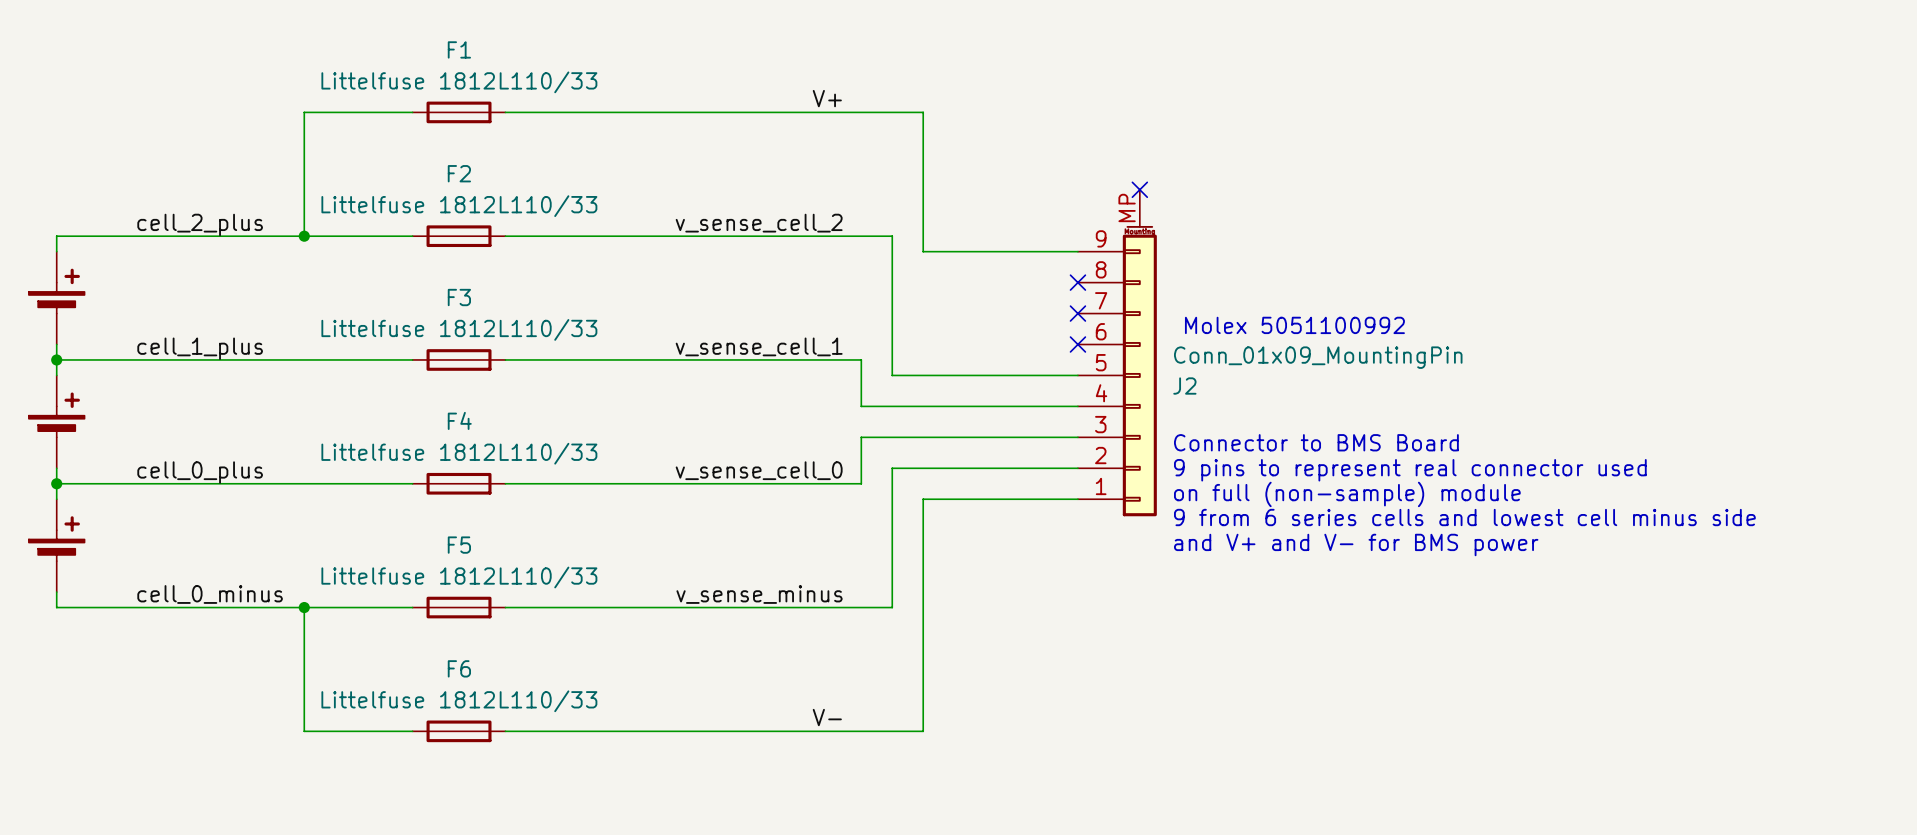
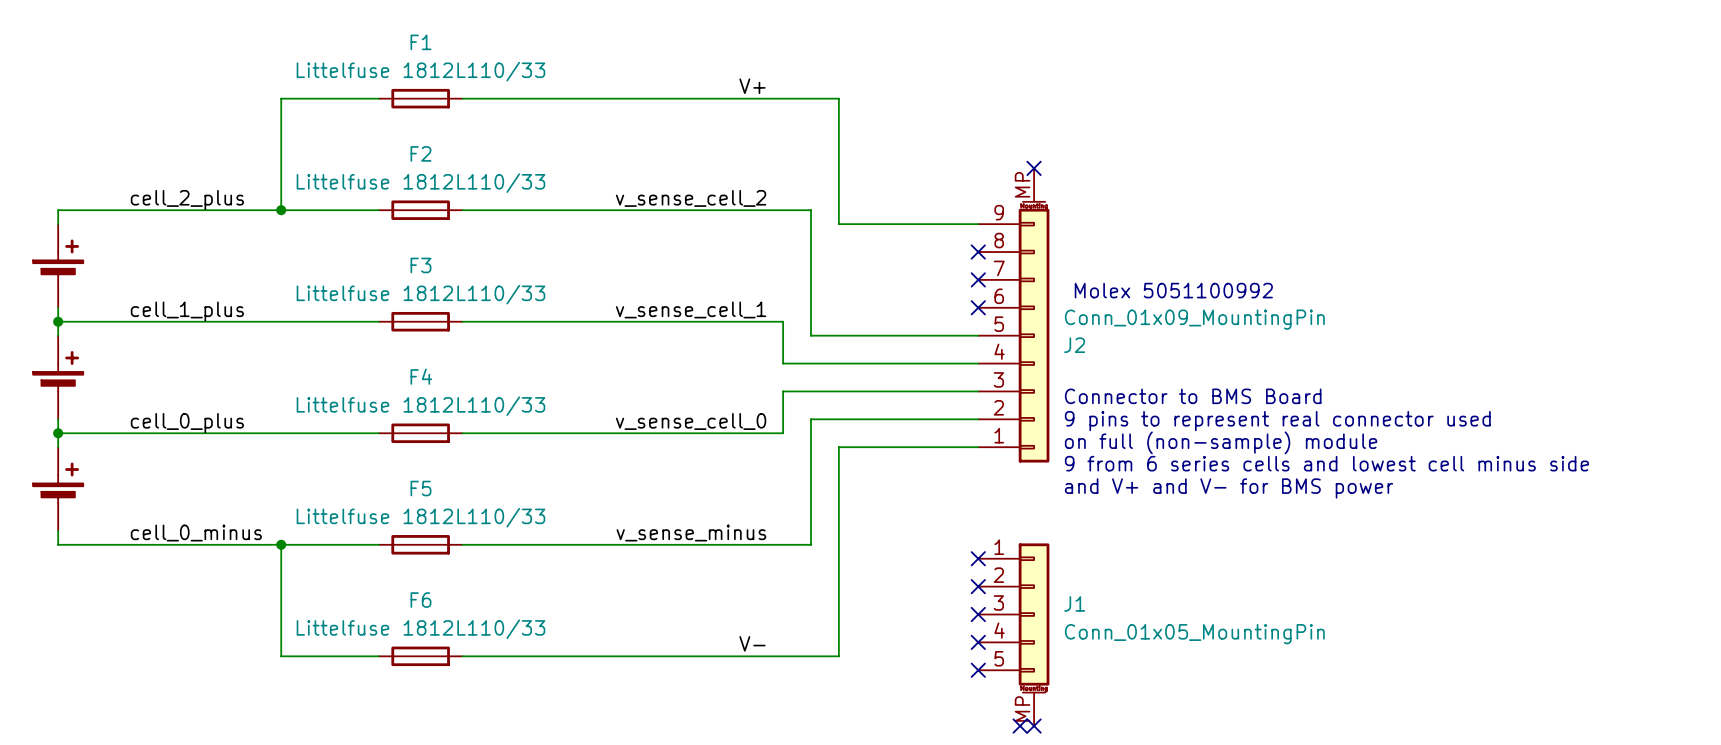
no-connect mark: none -> (978, 558)
no-connect mark: none -> (978, 586)
no-connect mark: none -> (978, 614)
J1: none -> Conn_01x05_MountingPin (1013, 634)
no-connect mark: none -> (978, 642)
no-connect mark: none -> (978, 670)
no-connect mark: none -> (1020, 726)
no-connect mark: none -> (1034, 726)

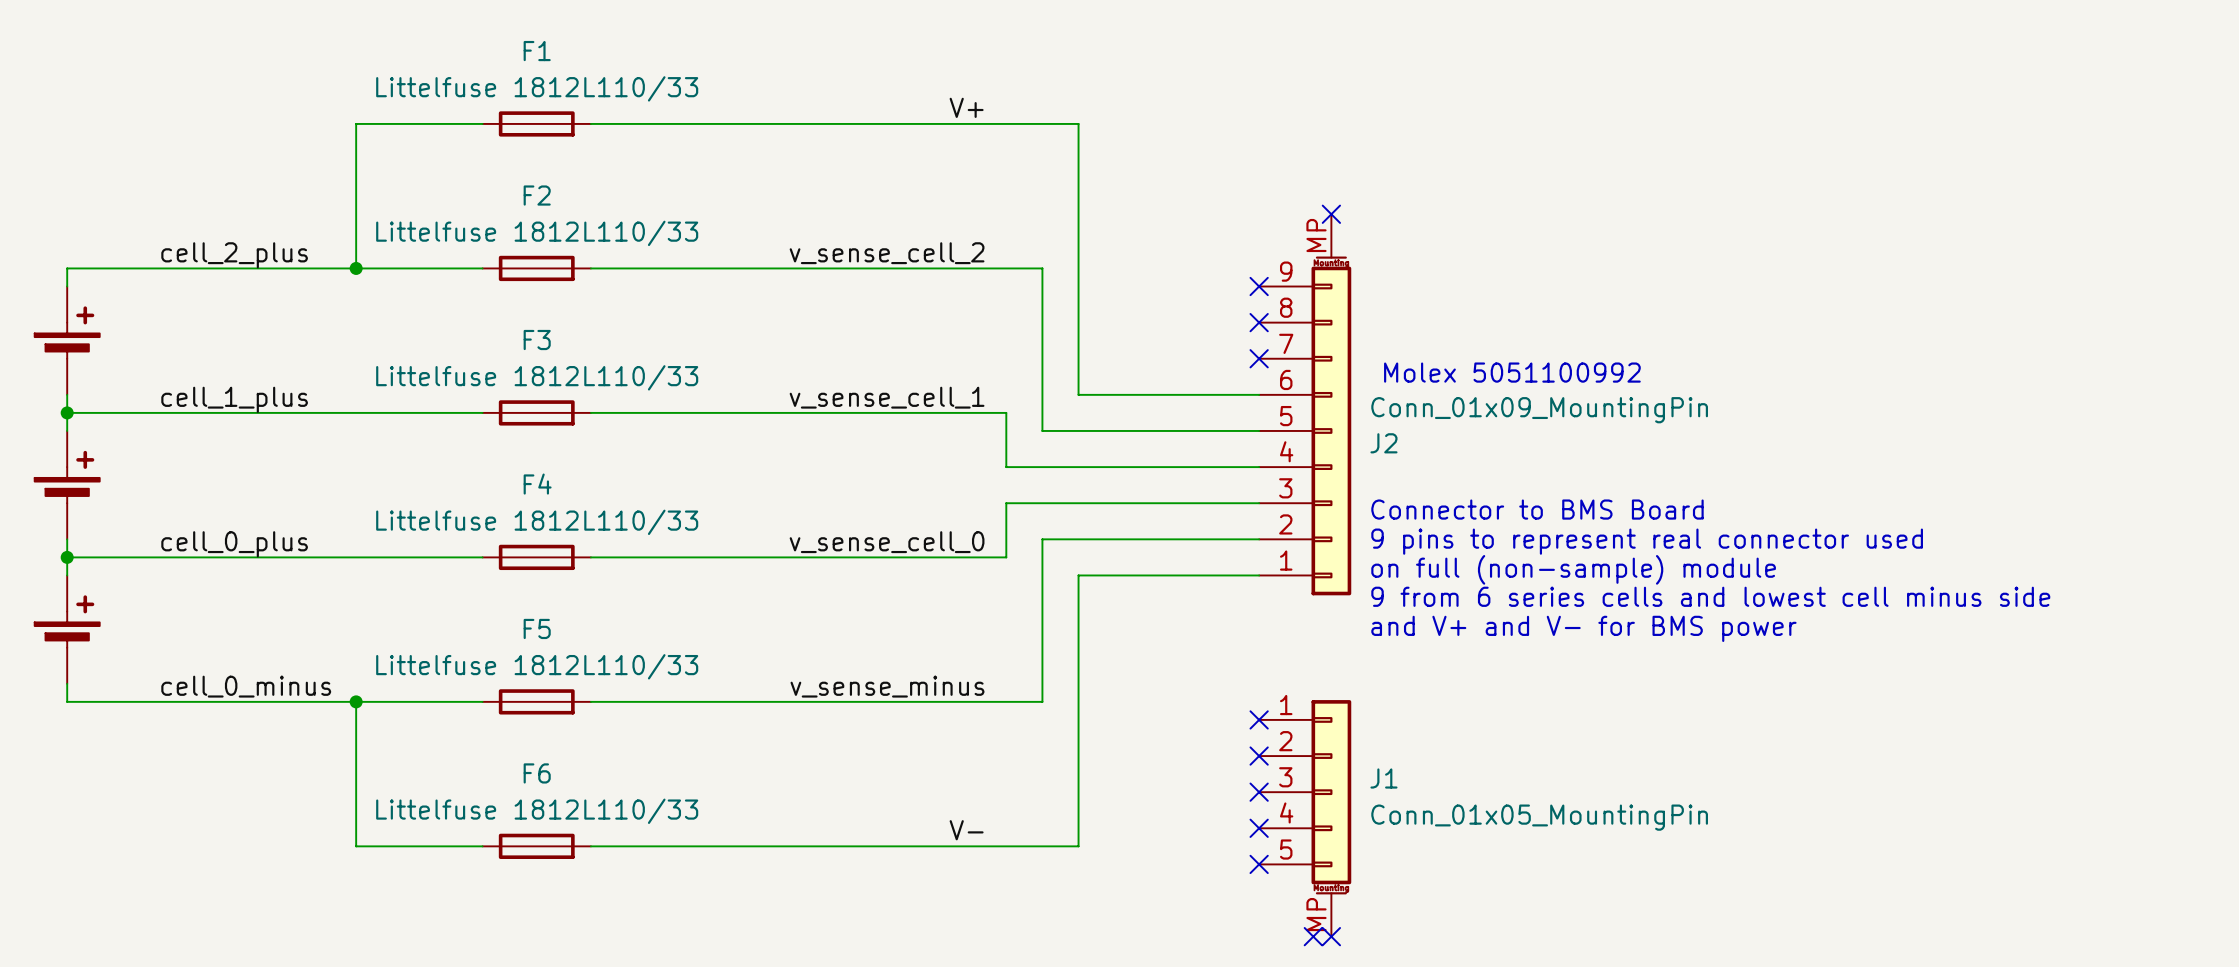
wire: (838, 224) (978, 224) -> (1078, 286) (1078, 394) (1259, 394)
no-connect mark: none -> (1259, 286)
no-connect mark: (978, 307) -> none

